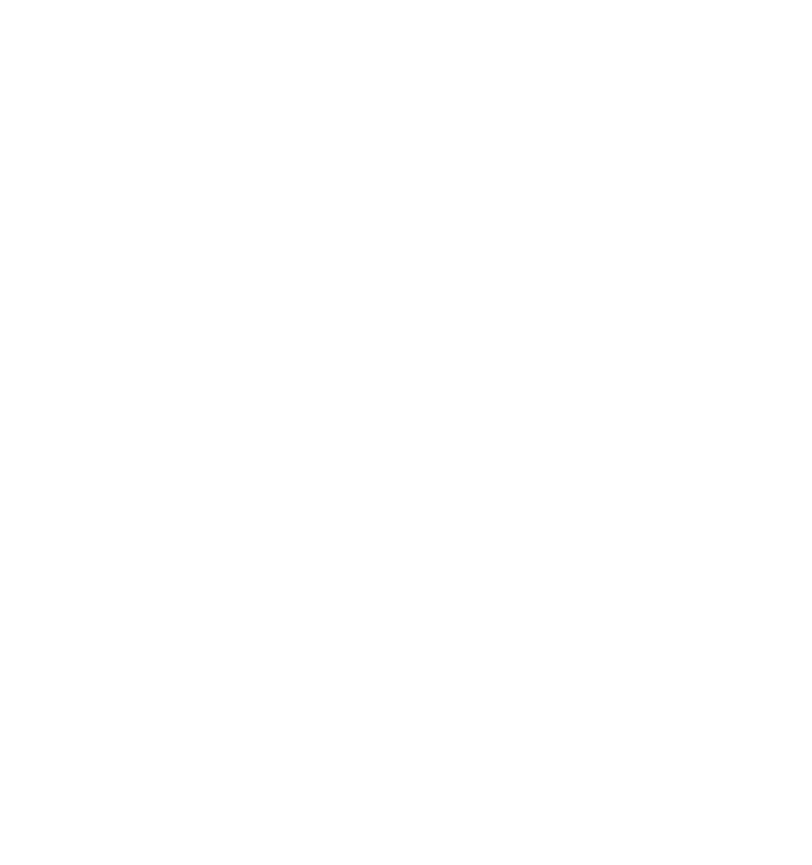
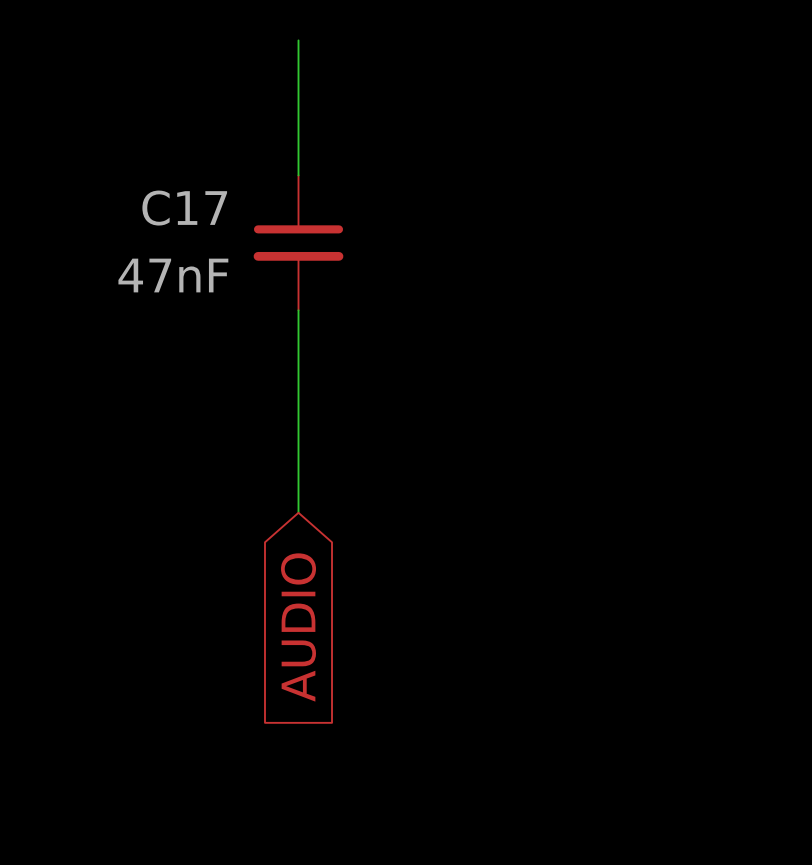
wire: none -> (298, 40) (298, 175)
C17: none -> 47nF (298, 242)
wire: none -> (298, 310) (298, 512)
global label: none -> AUDIO (298, 627)

